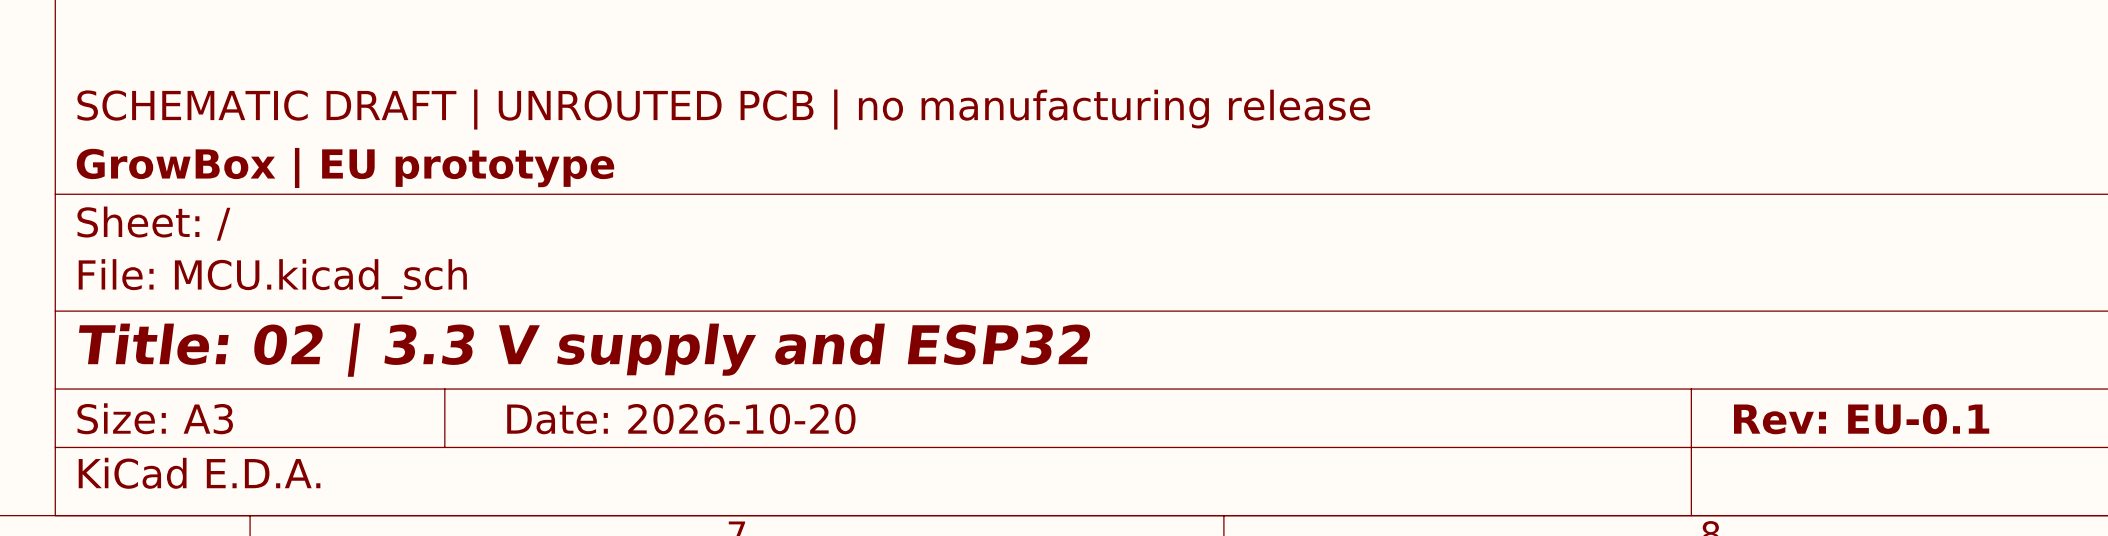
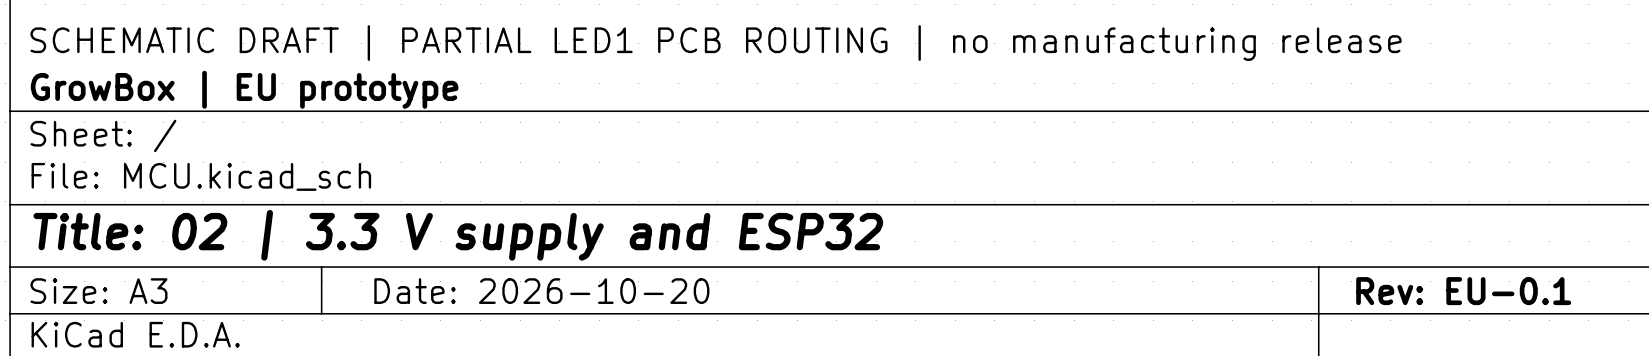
title block: SCHEMATIC DRAFT | UNROUTED PCB | no manufacturing release (723, 109) -> SCHEMATIC DRAFT | PARTIAL LED1 PCB ROUTING | no manufacturing release (716, 43)

